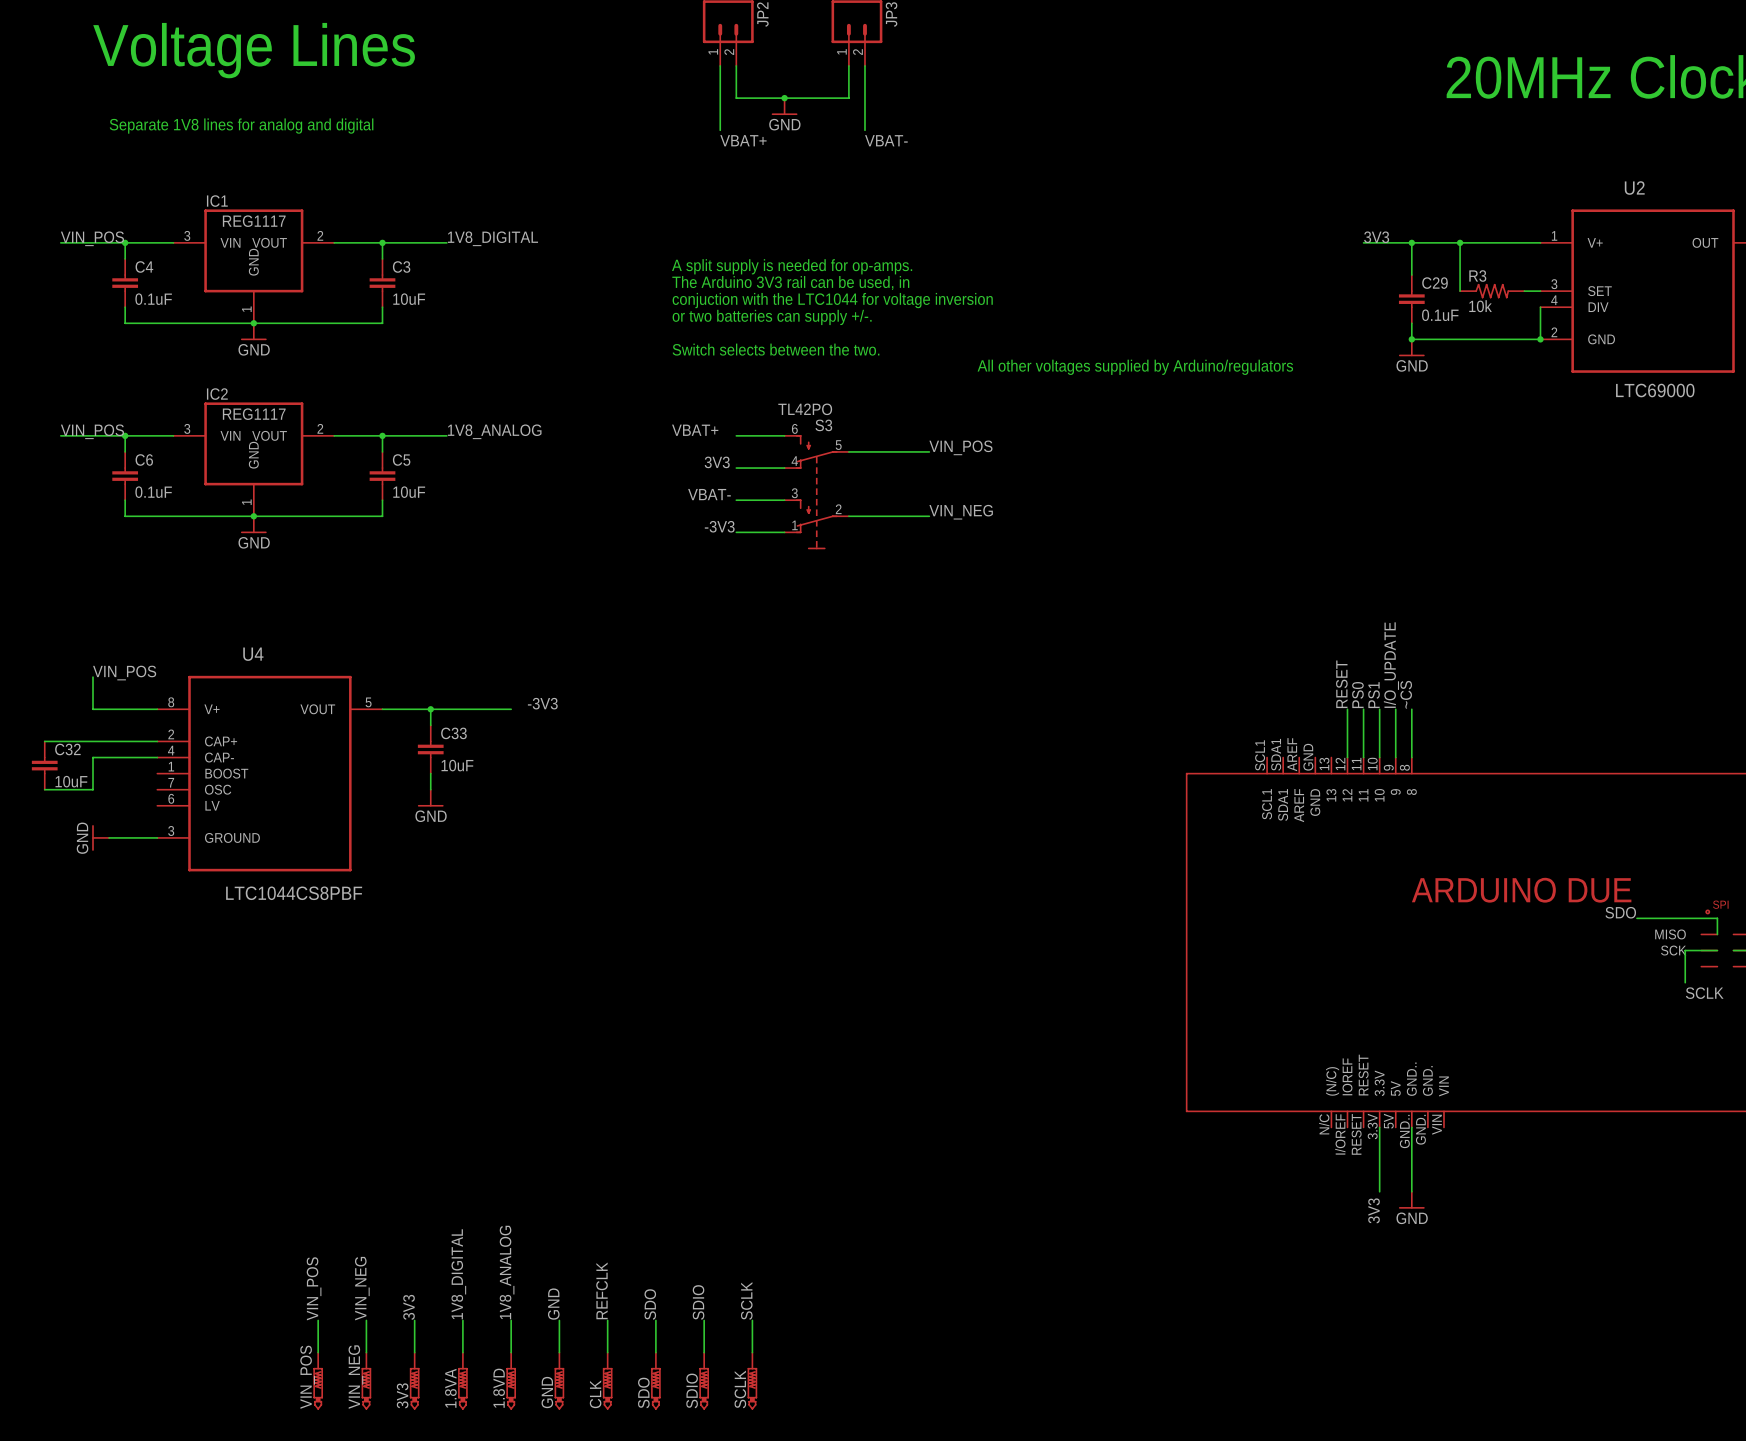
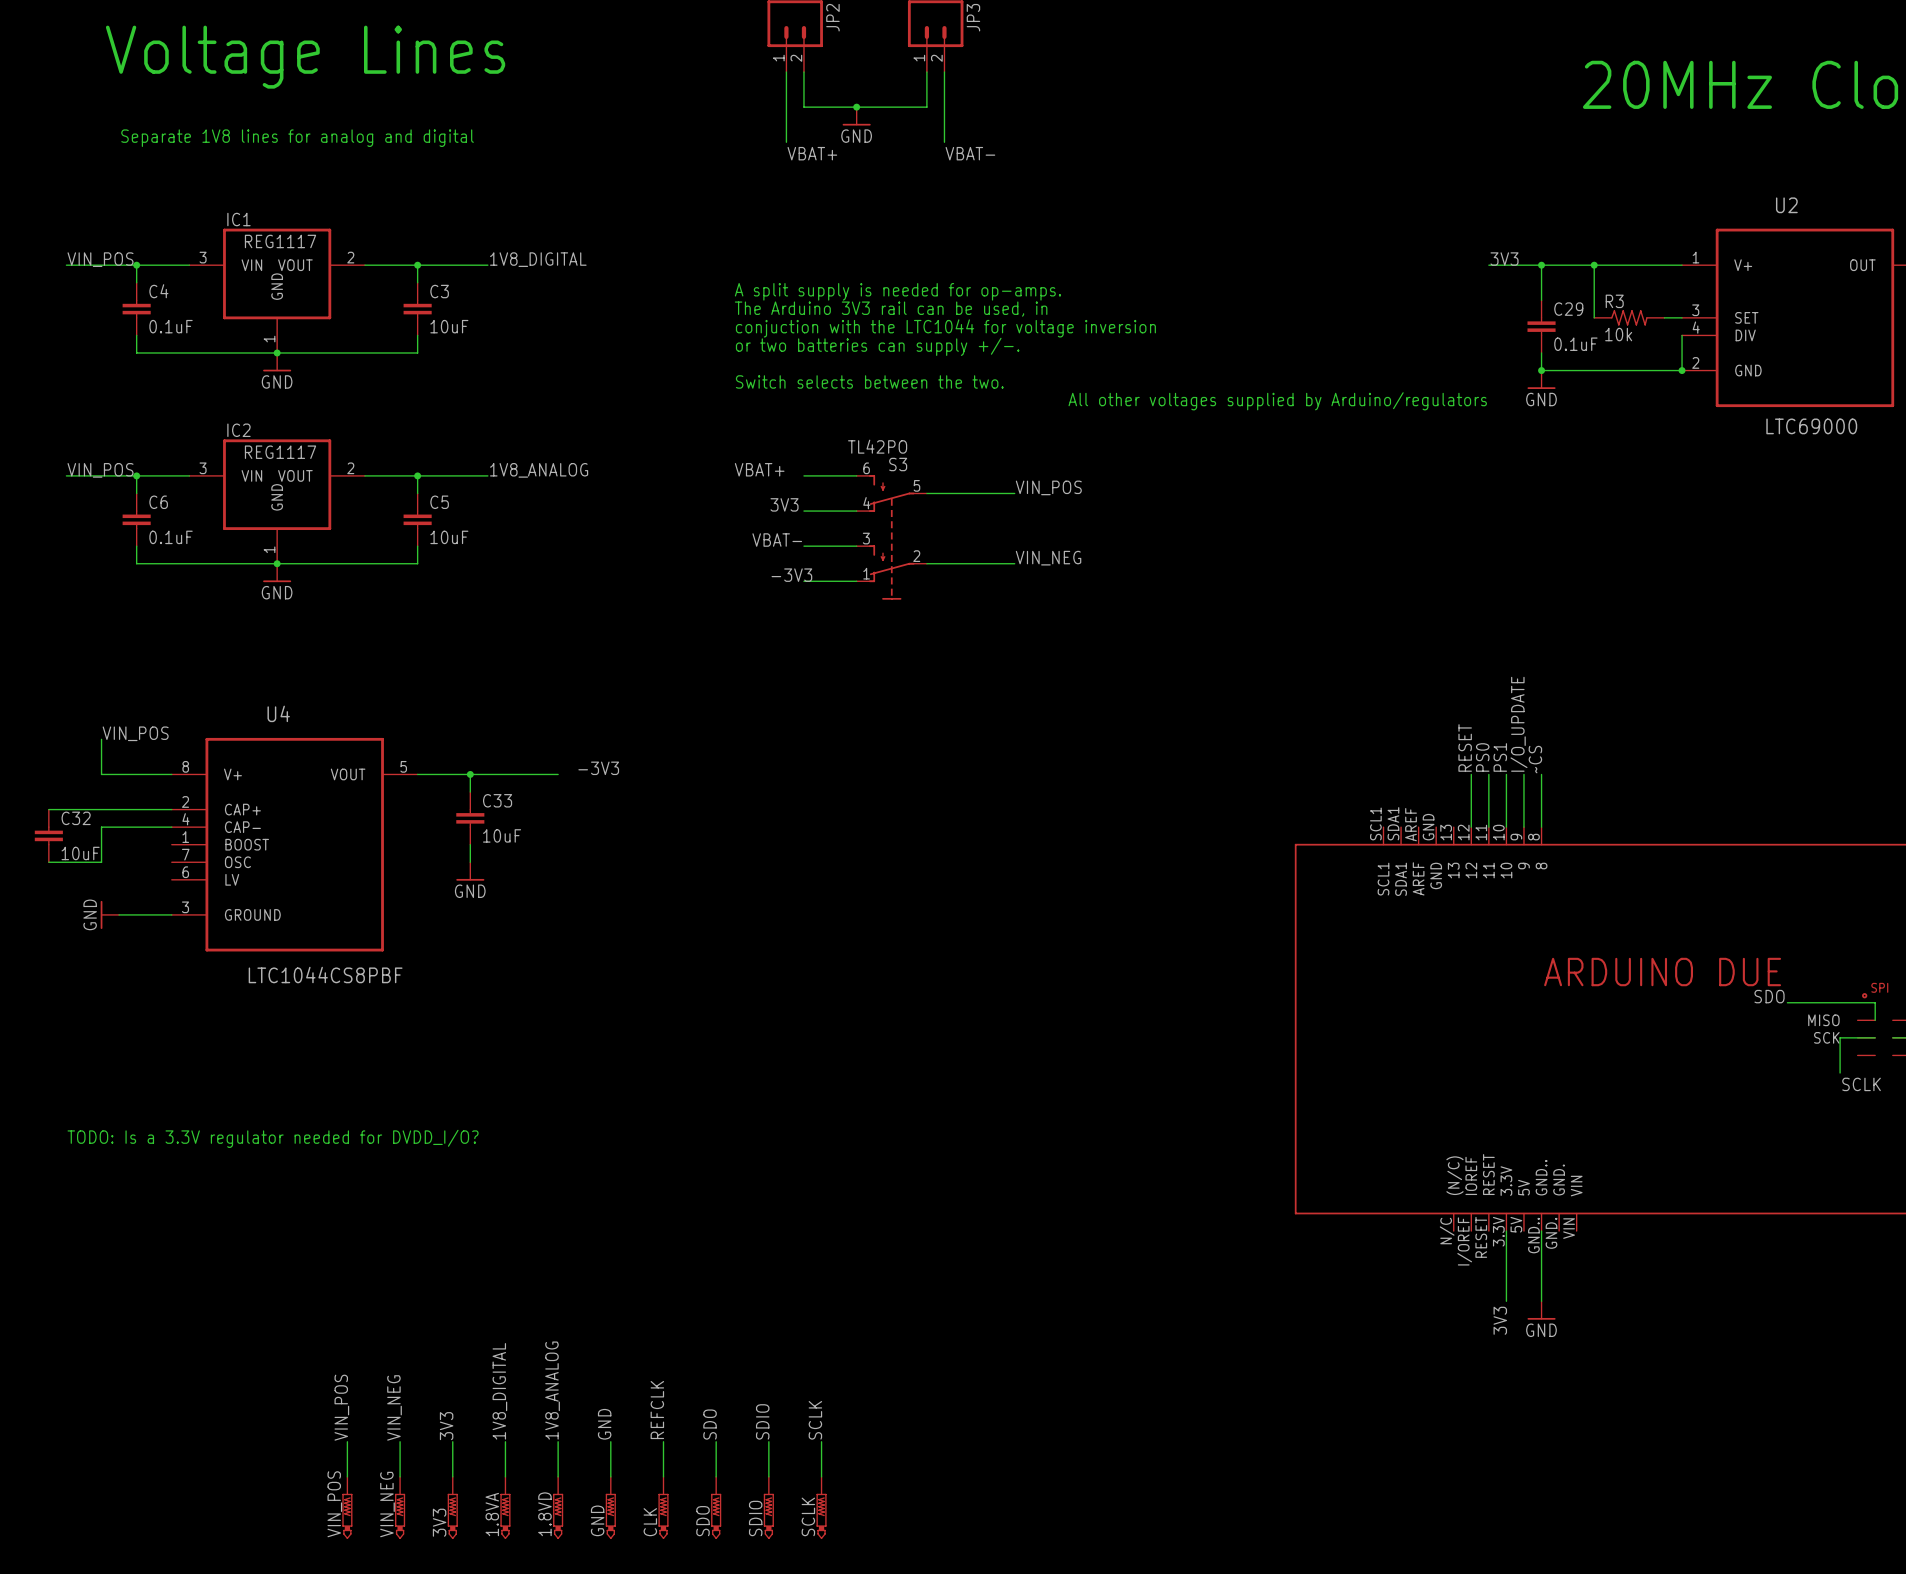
text: none -> TODO: Is a 3.3V regulator needed for DVDD_I/O? (273, 1138)

